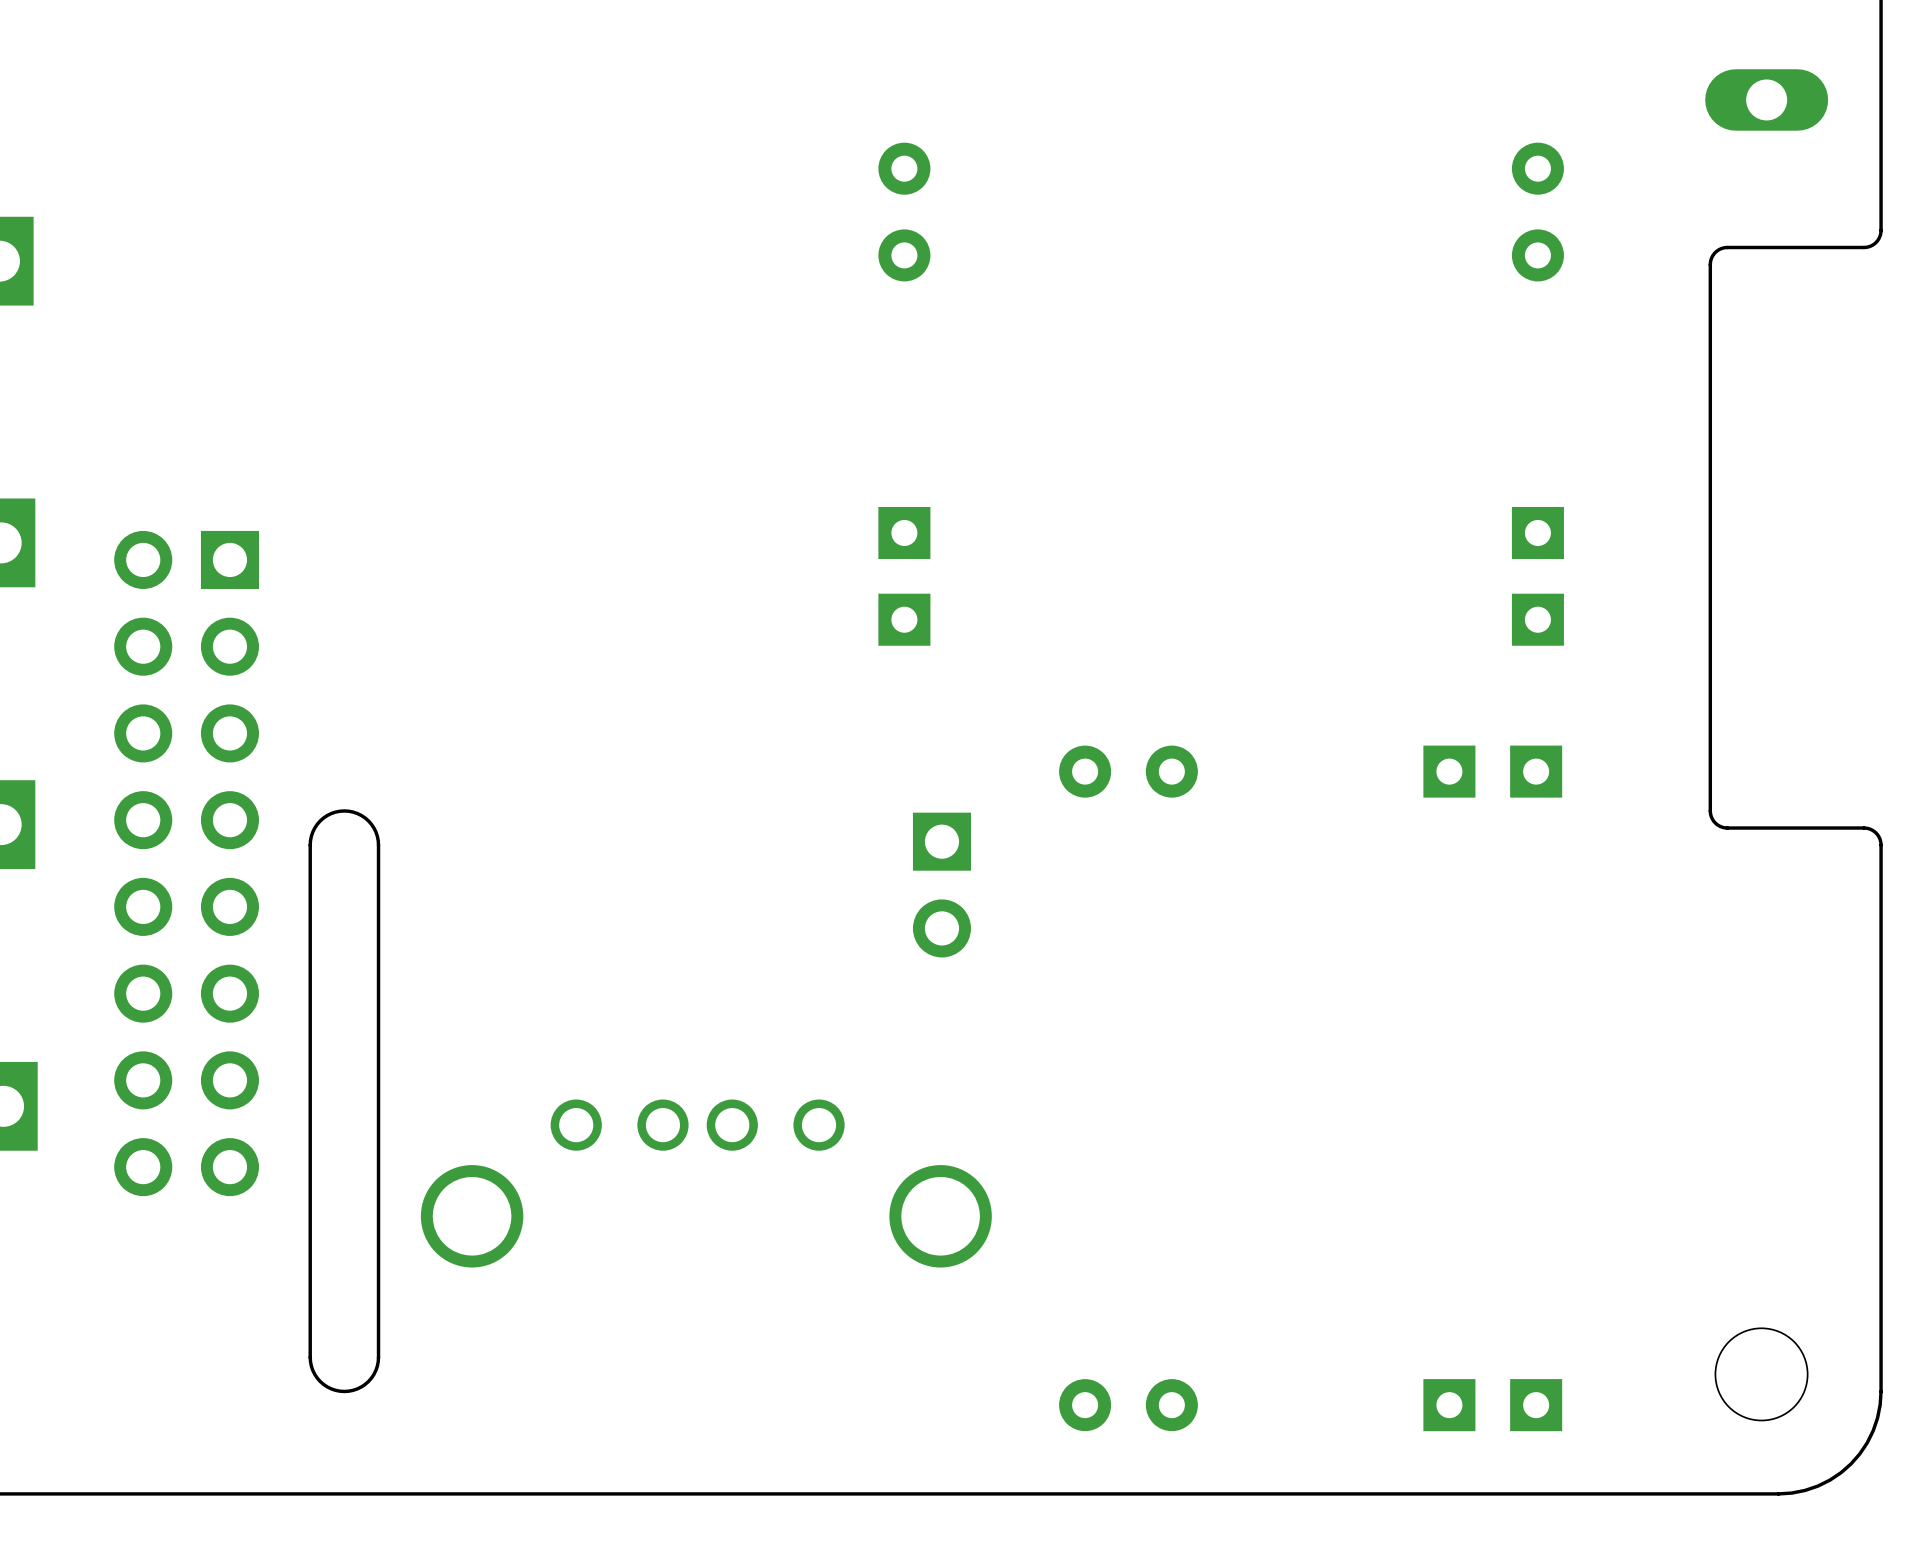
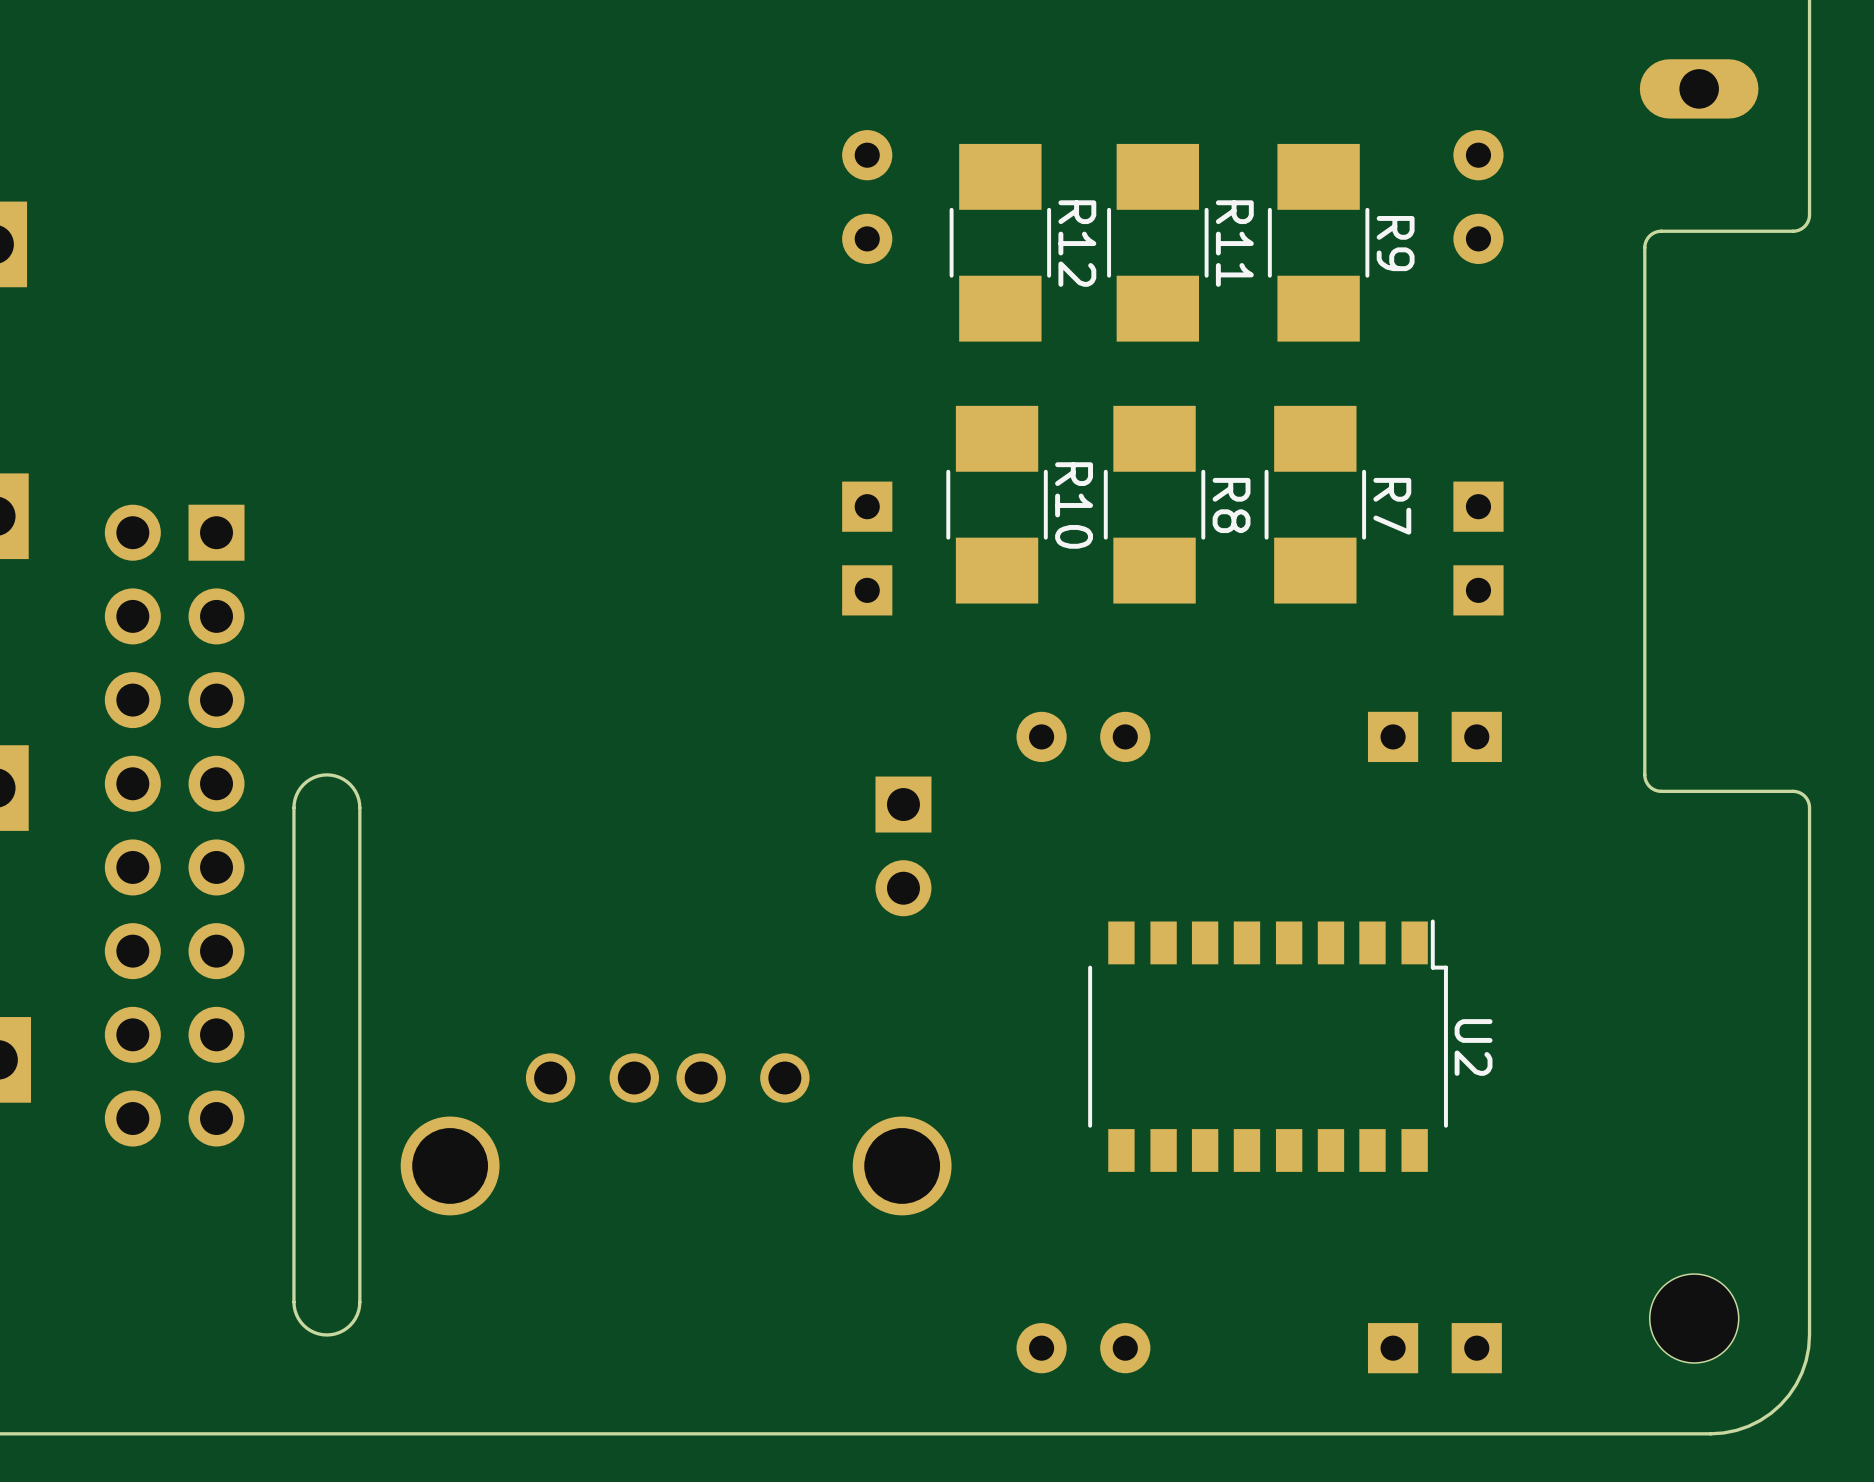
R12: none -> (1000, 242)
R11: none -> (1157, 242)
R9: none -> (1318, 242)
R10: none -> (997, 504)
R8: none -> (1154, 504)
R7: none -> (1315, 504)
U2: none -> (1268, 1045)

